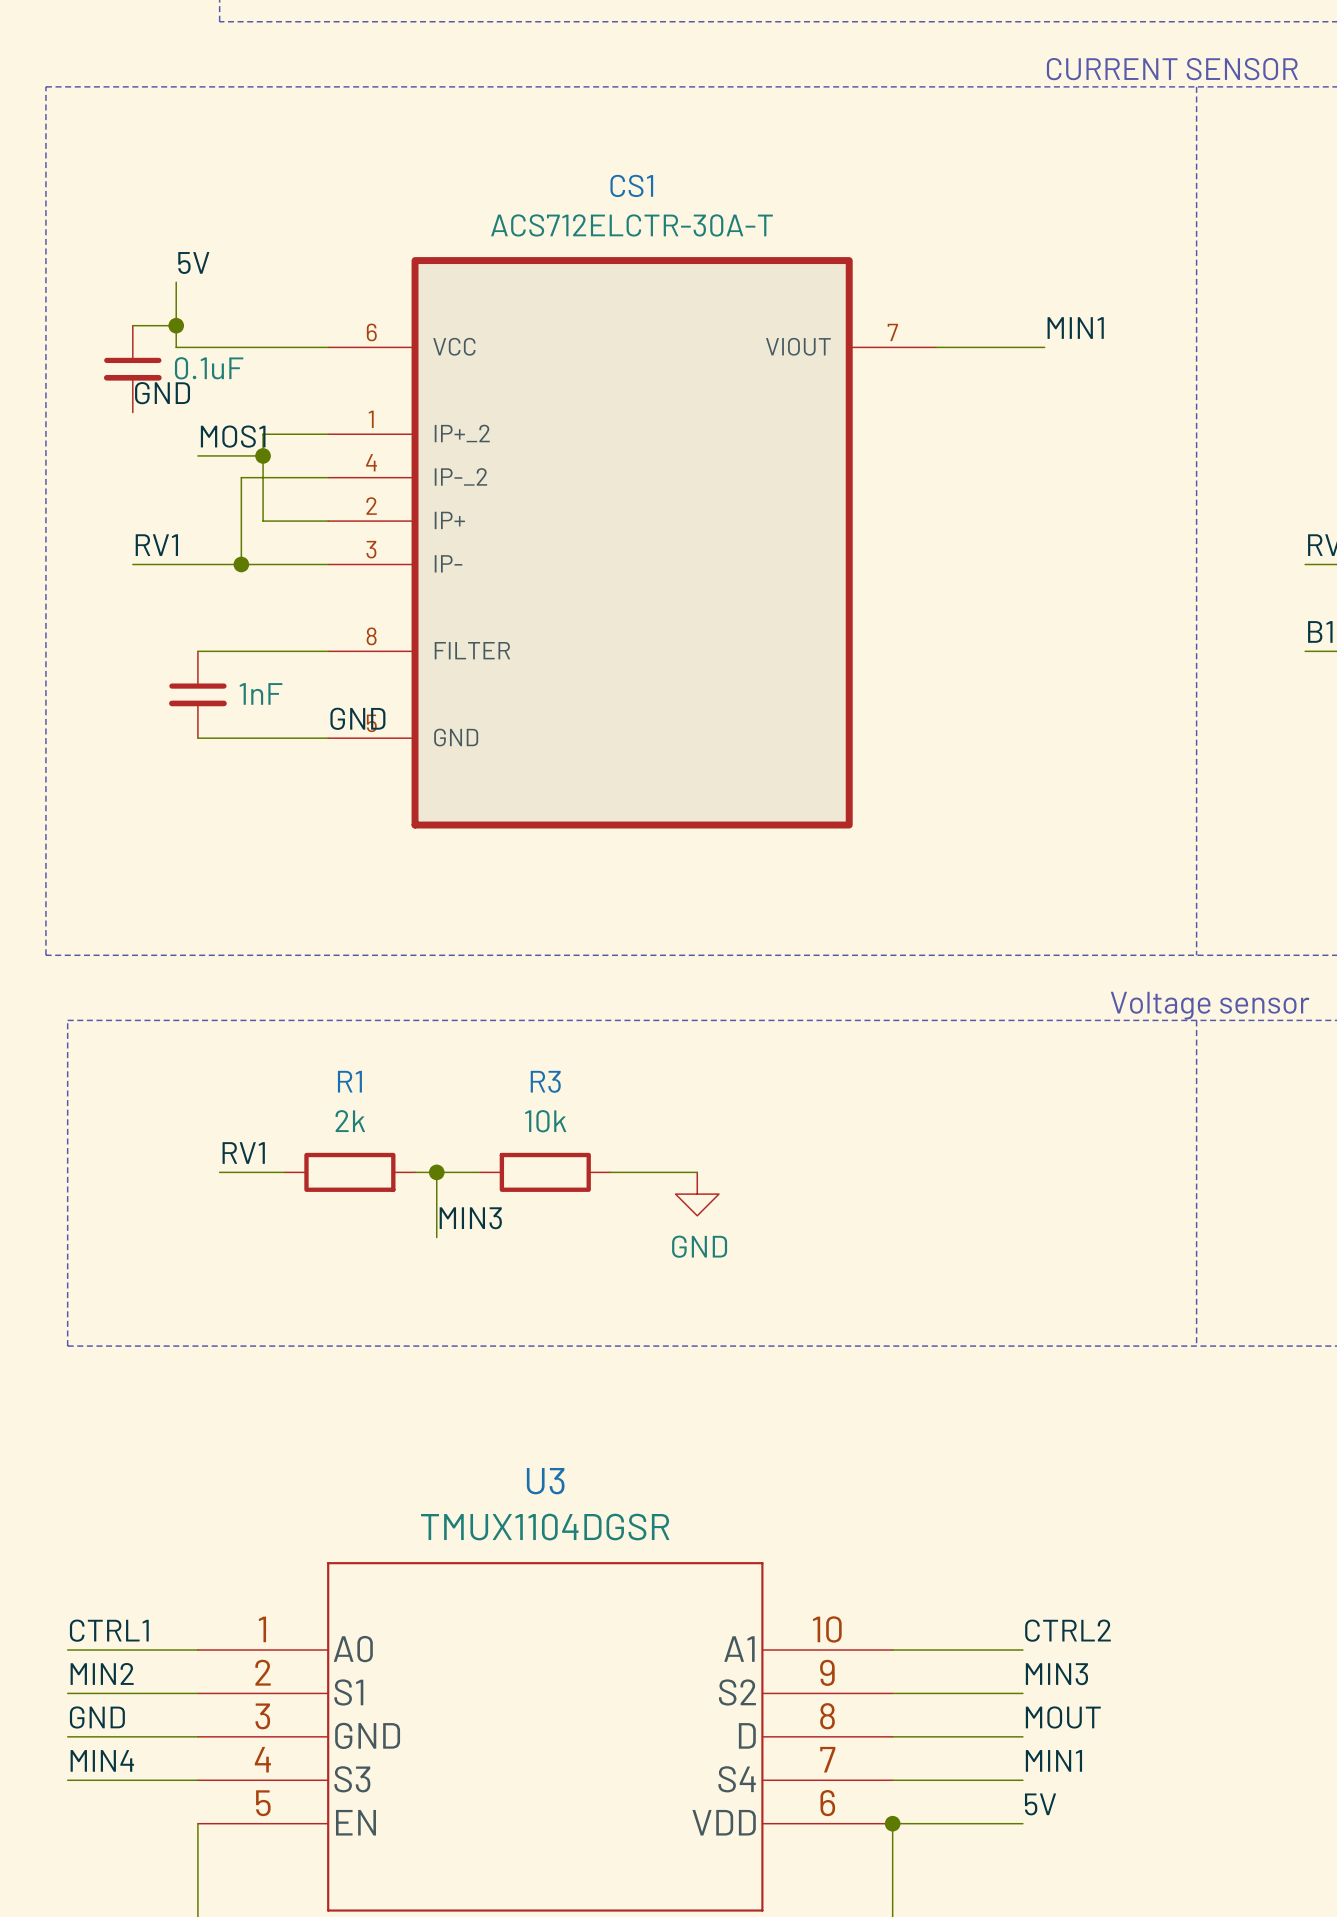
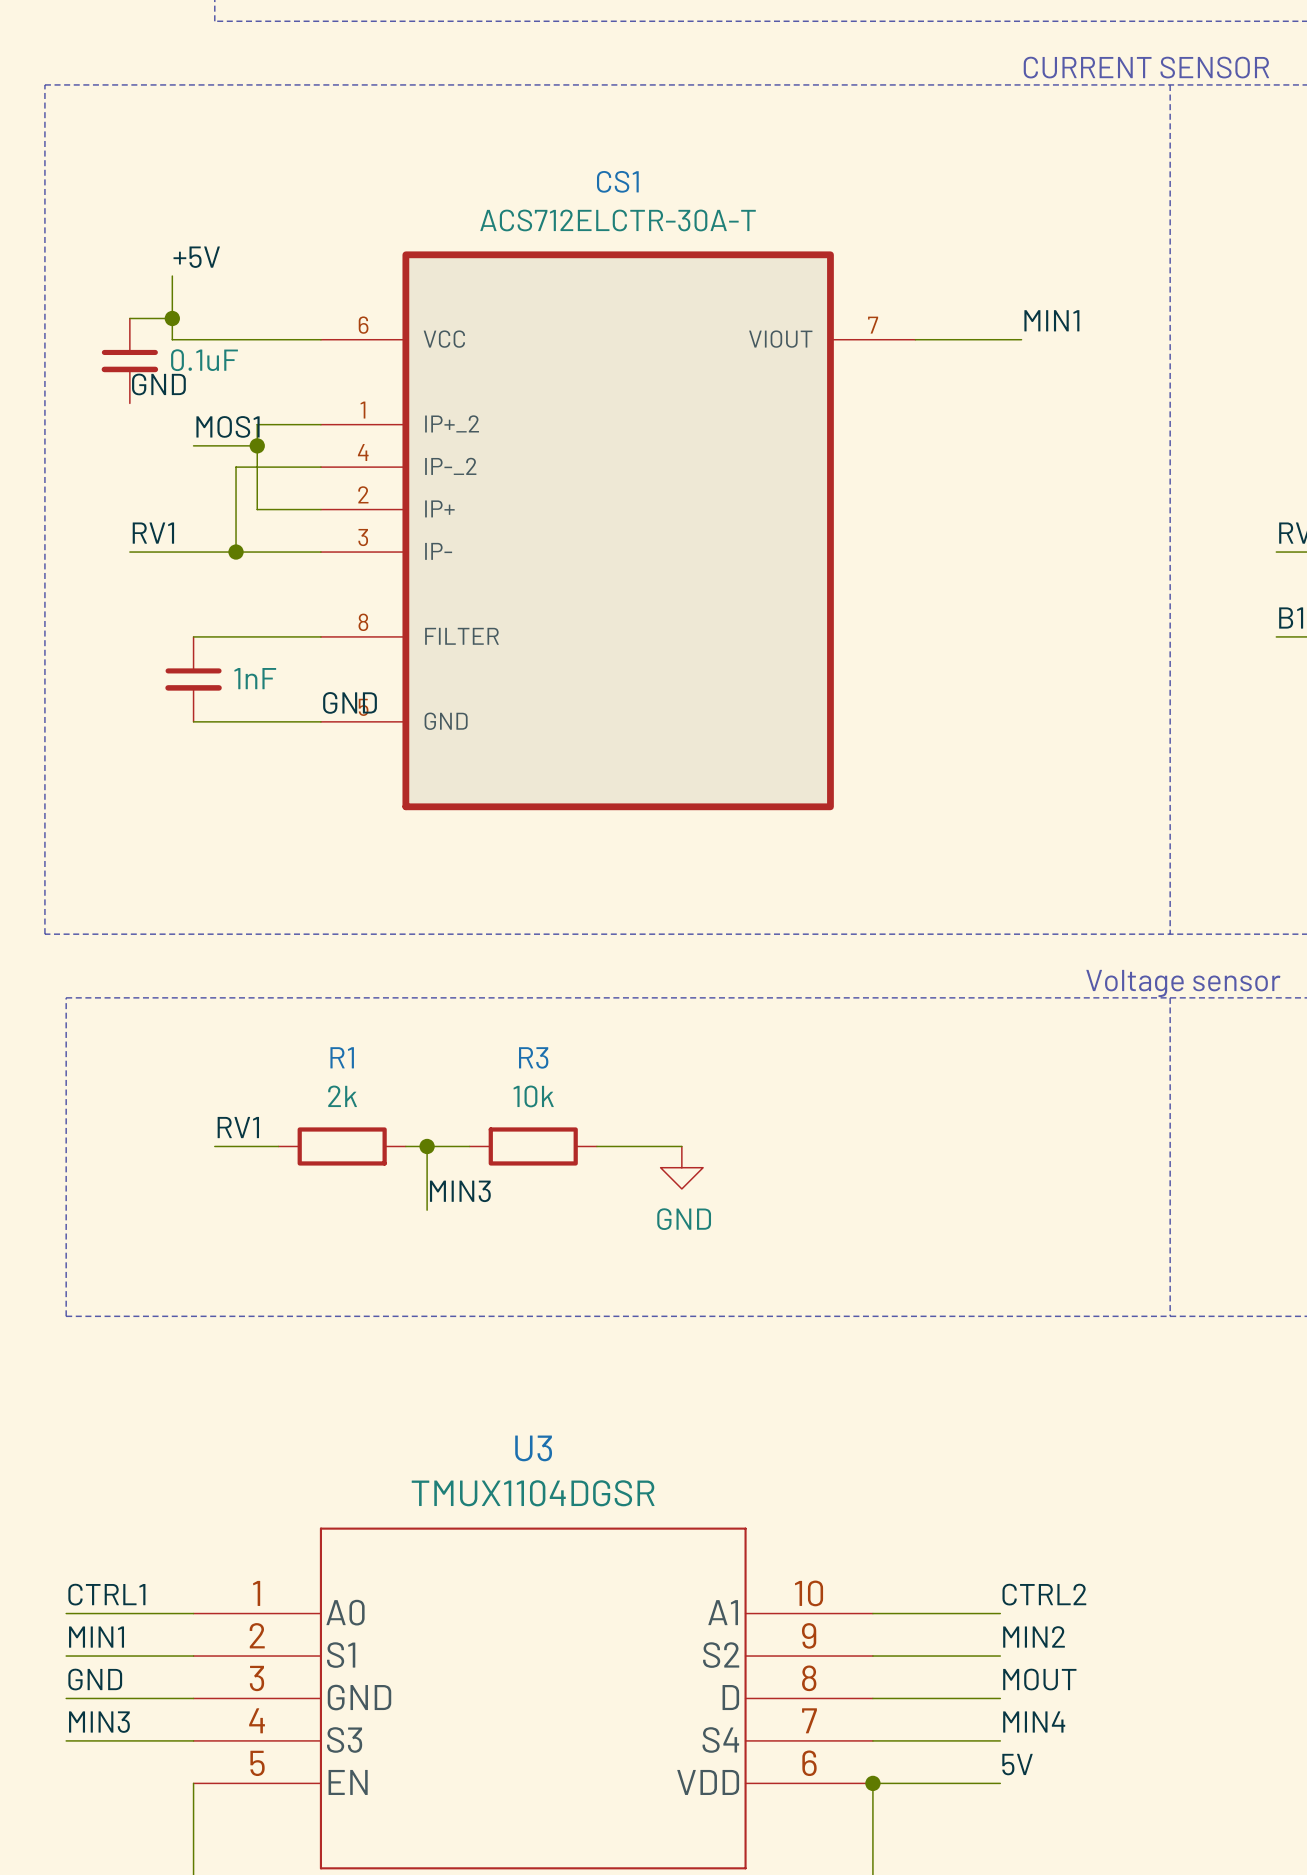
label: 5V (193, 263) -> +5V (196, 257)
label: MIN2 (102, 1673) -> MIN1 (96, 1637)
label: MIN3 (1056, 1674) -> MIN2 (1034, 1636)
label: MIN4 (102, 1760) -> MIN3 (99, 1722)
label: MIN1 (1053, 1760) -> MIN4 (1034, 1721)

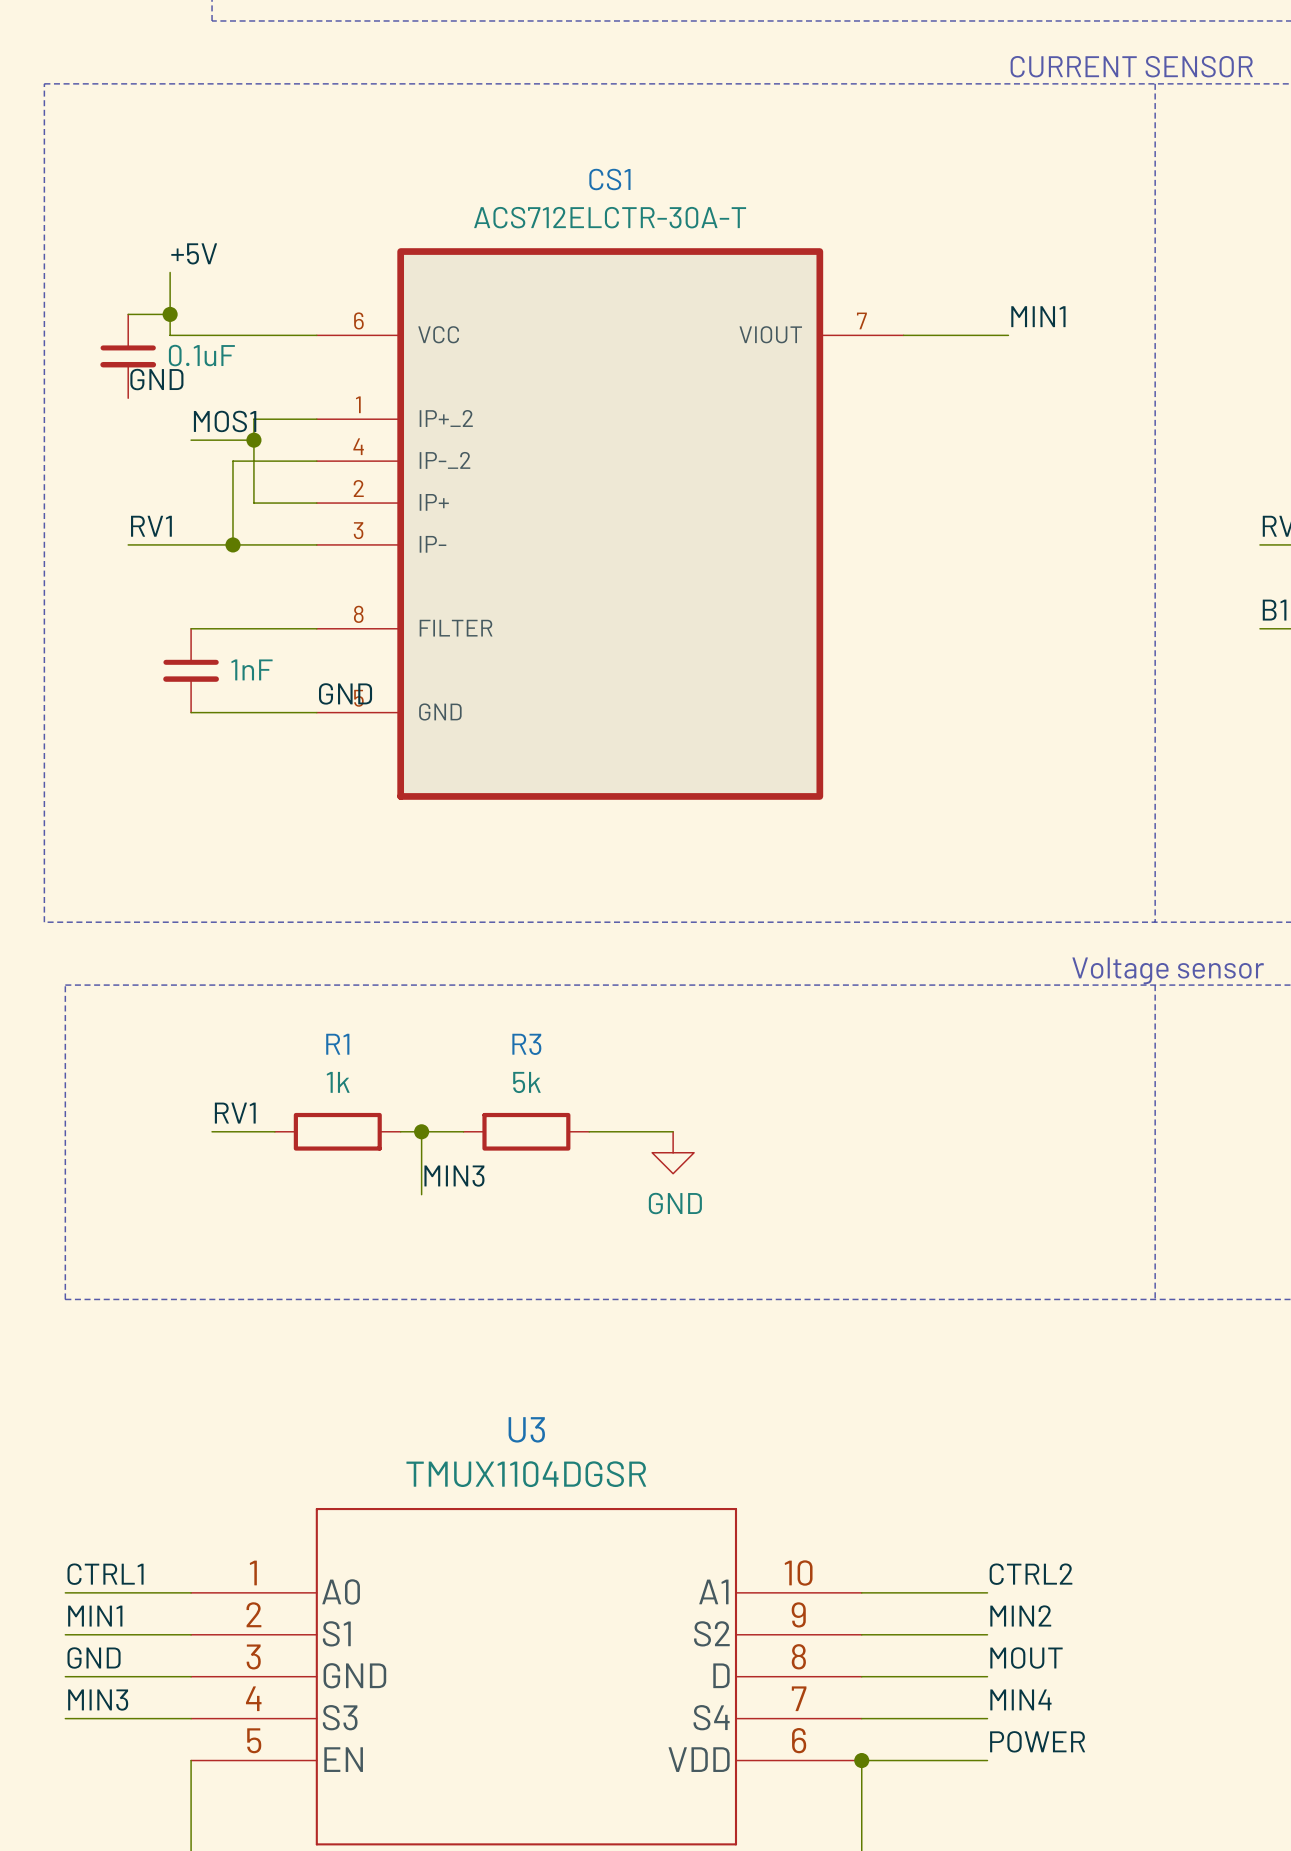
R1 value: 2k (342, 1096) -> 1k (338, 1082)
R3 value: 10k (533, 1096) -> 5k (526, 1082)
label: 5V (1017, 1764) -> POWER (1037, 1741)

